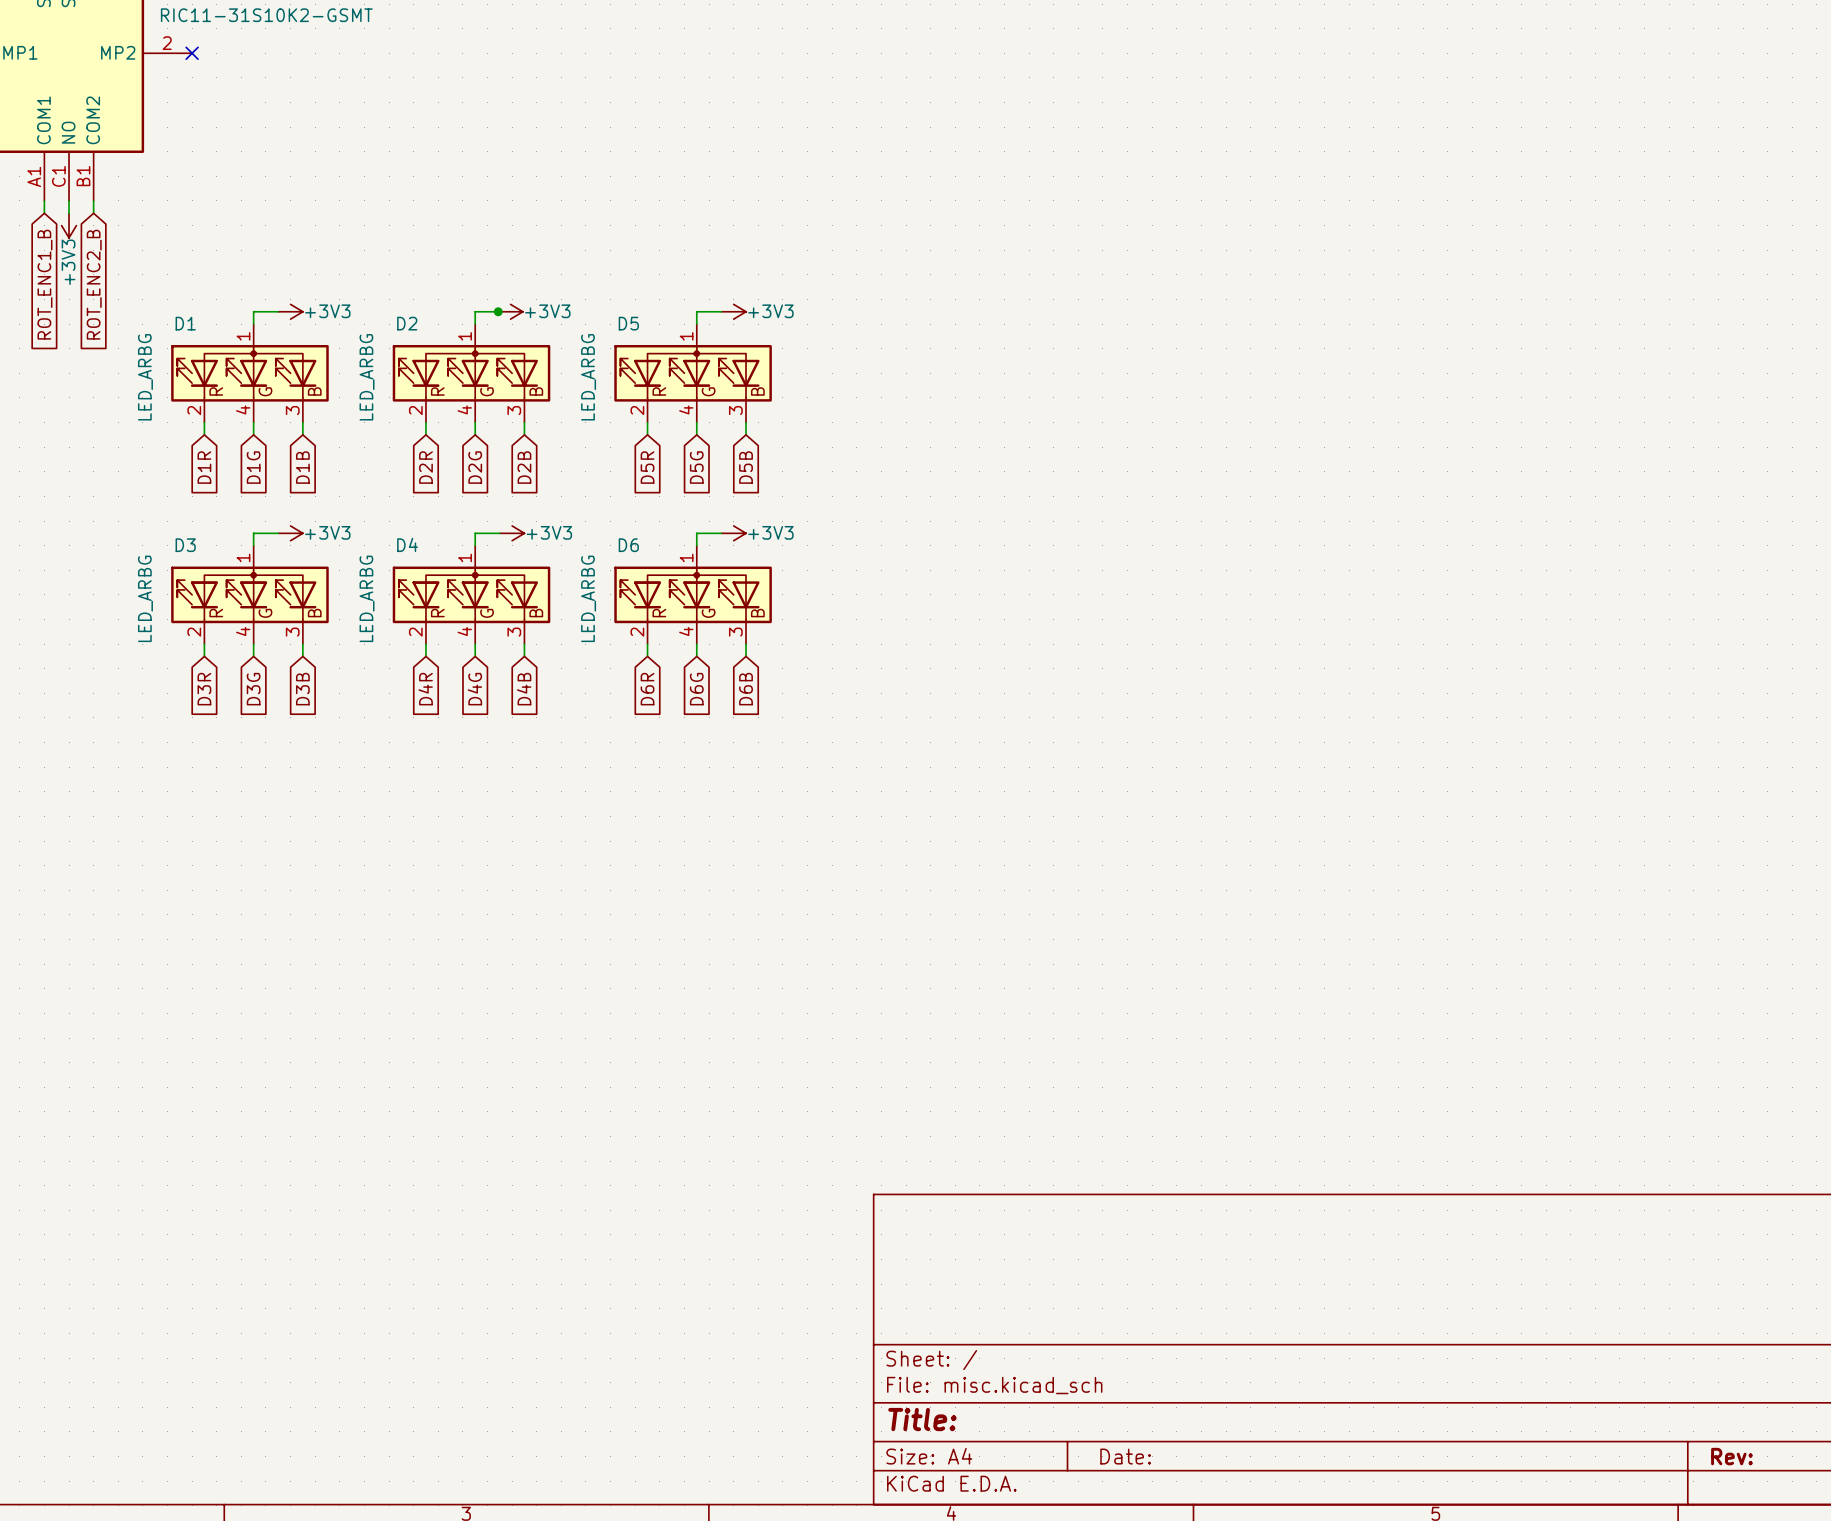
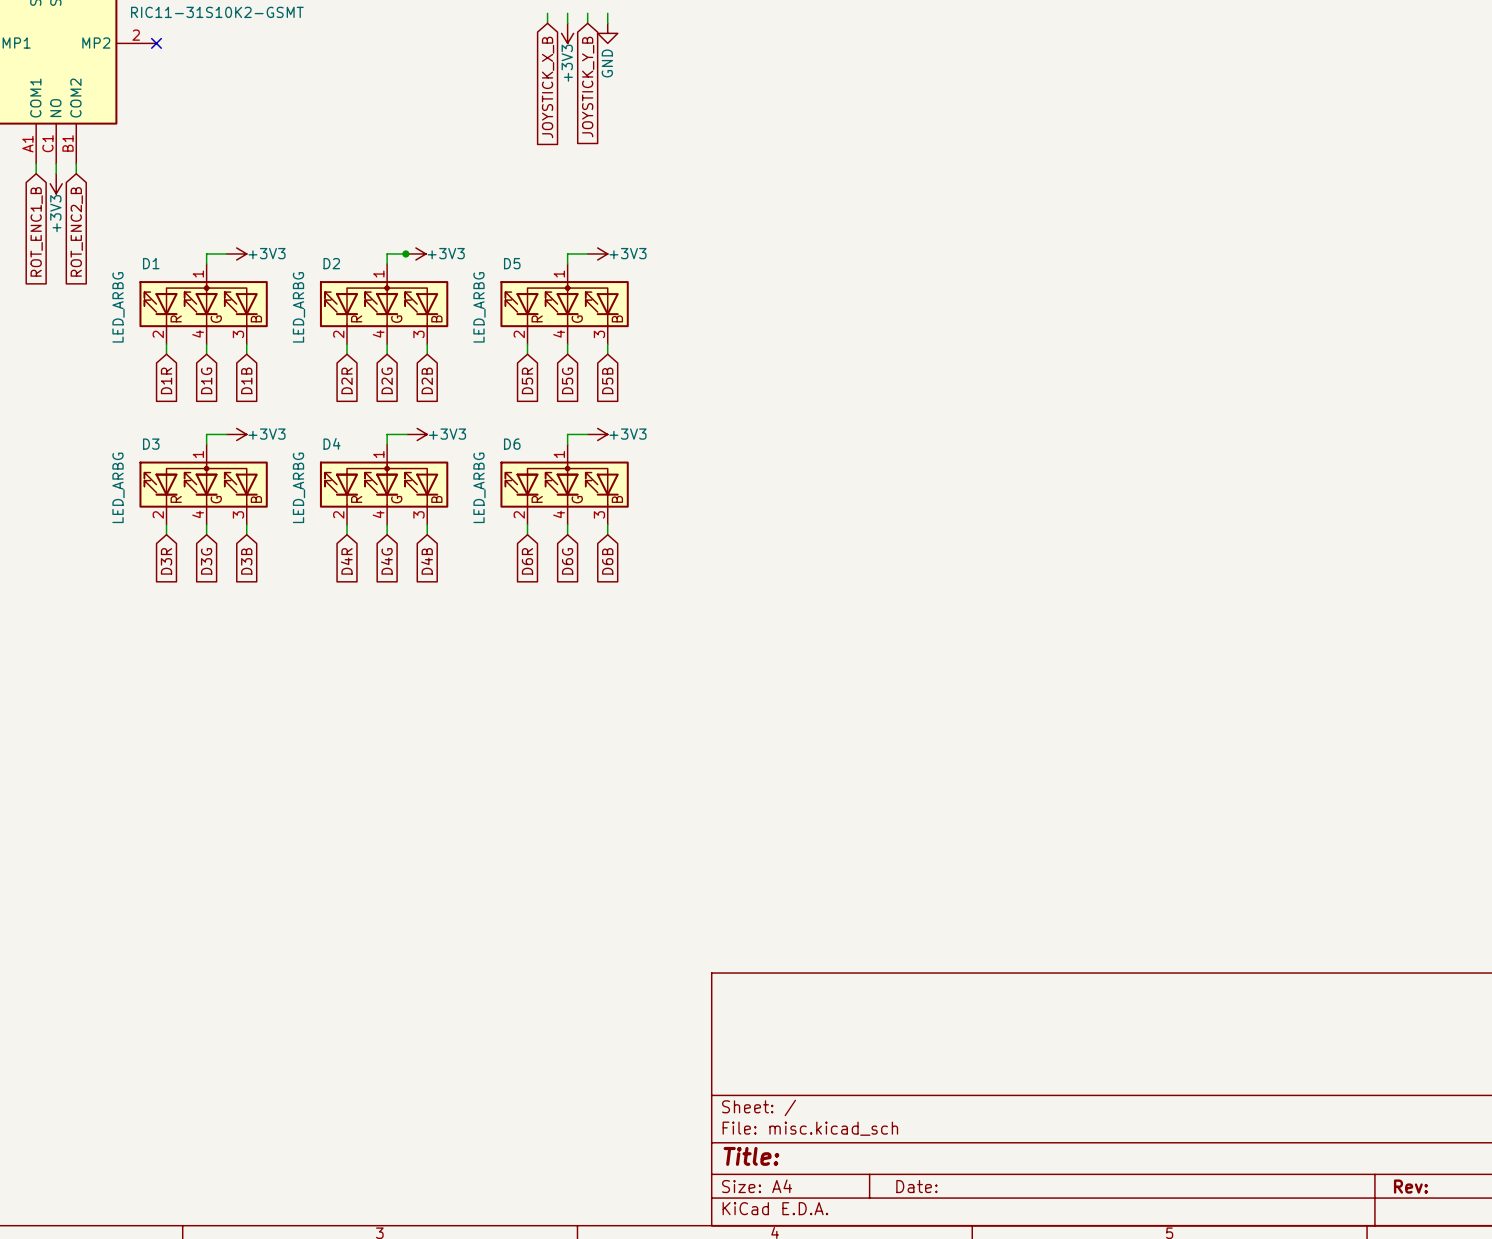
wire: none -> (547, 13) (547, 23)
wire: none -> (567, 13) (567, 23)
wire: none -> (587, 13) (587, 23)
wire: none -> (607, 13) (607, 23)
power symbol: none -> +3V3 (567, 33)
power symbol: none -> GND (607, 33)
global label: none -> JOYSTICK_Y_B (588, 86)
global label: none -> JOYSTICK_X_B (548, 87)

